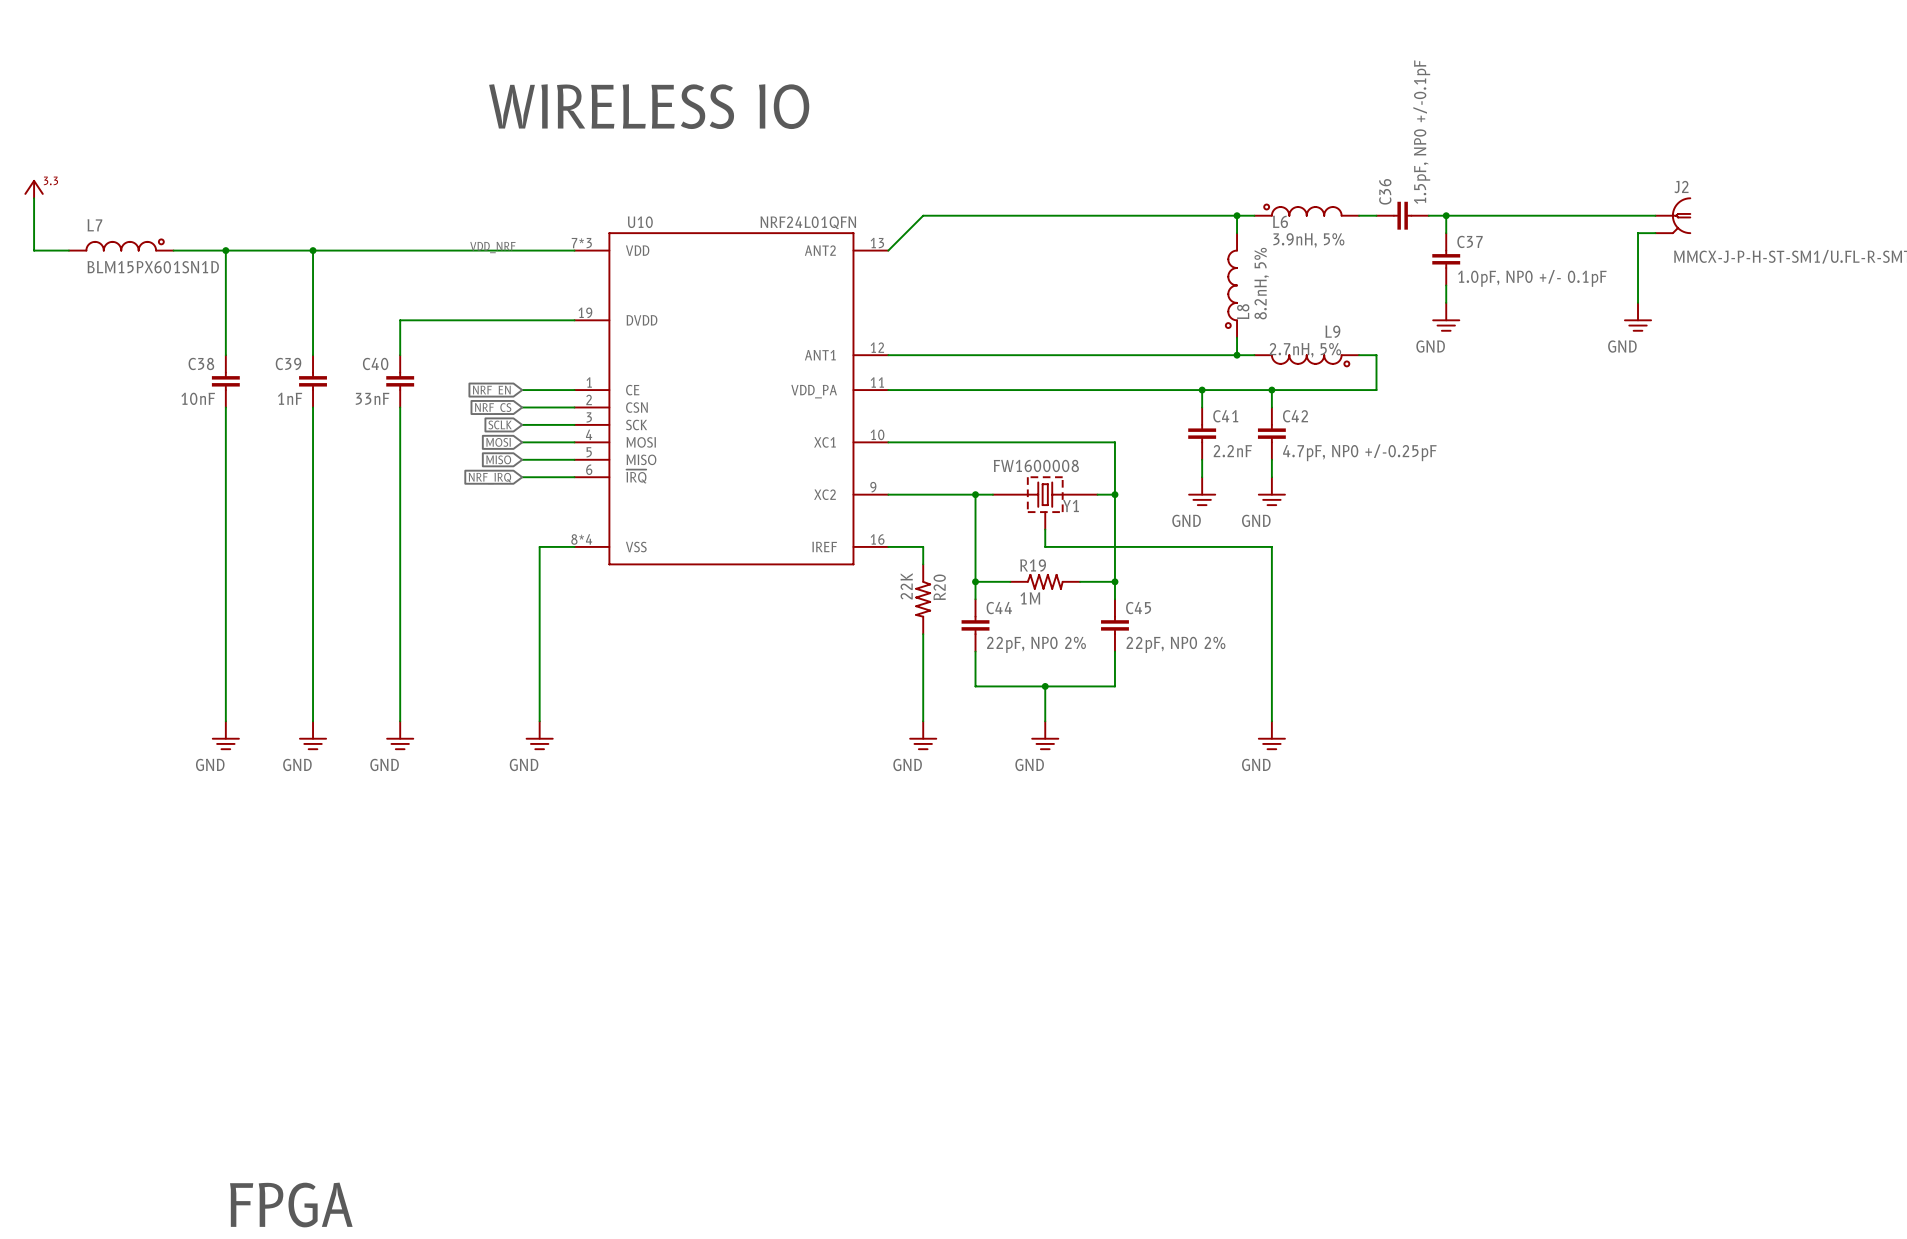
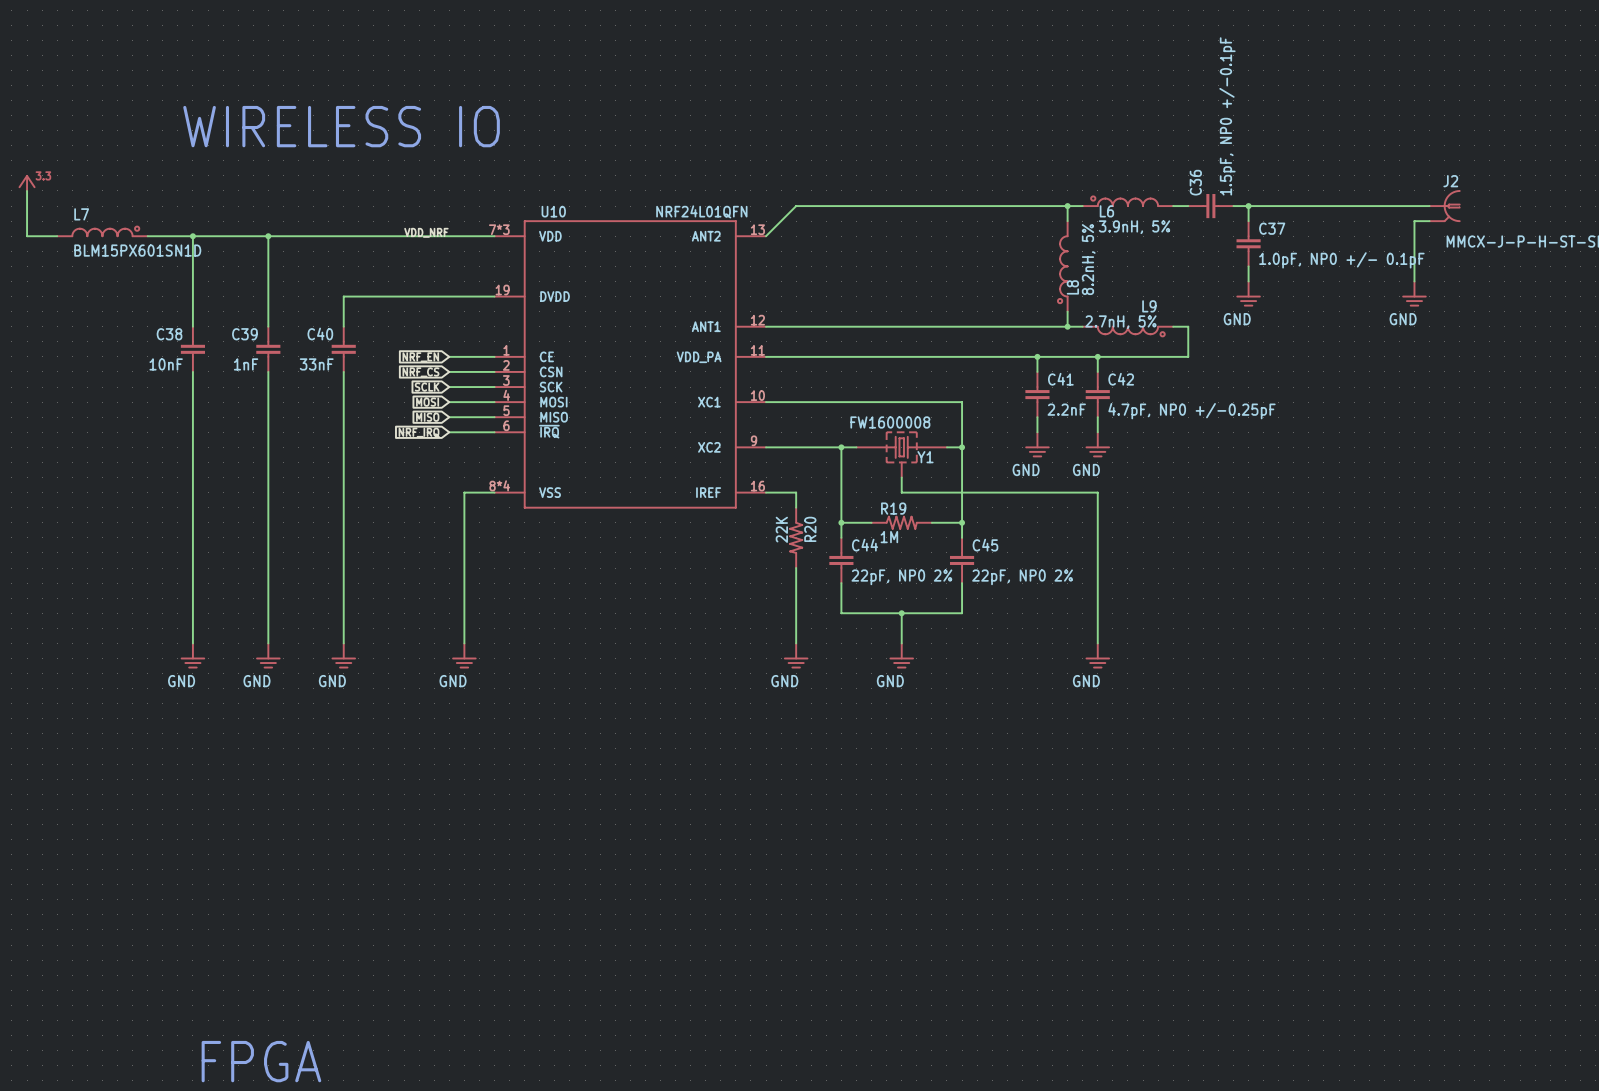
text: WIRELESS IO (649, 106) -> none
text: none -> WIRELESS IO (341, 126)

